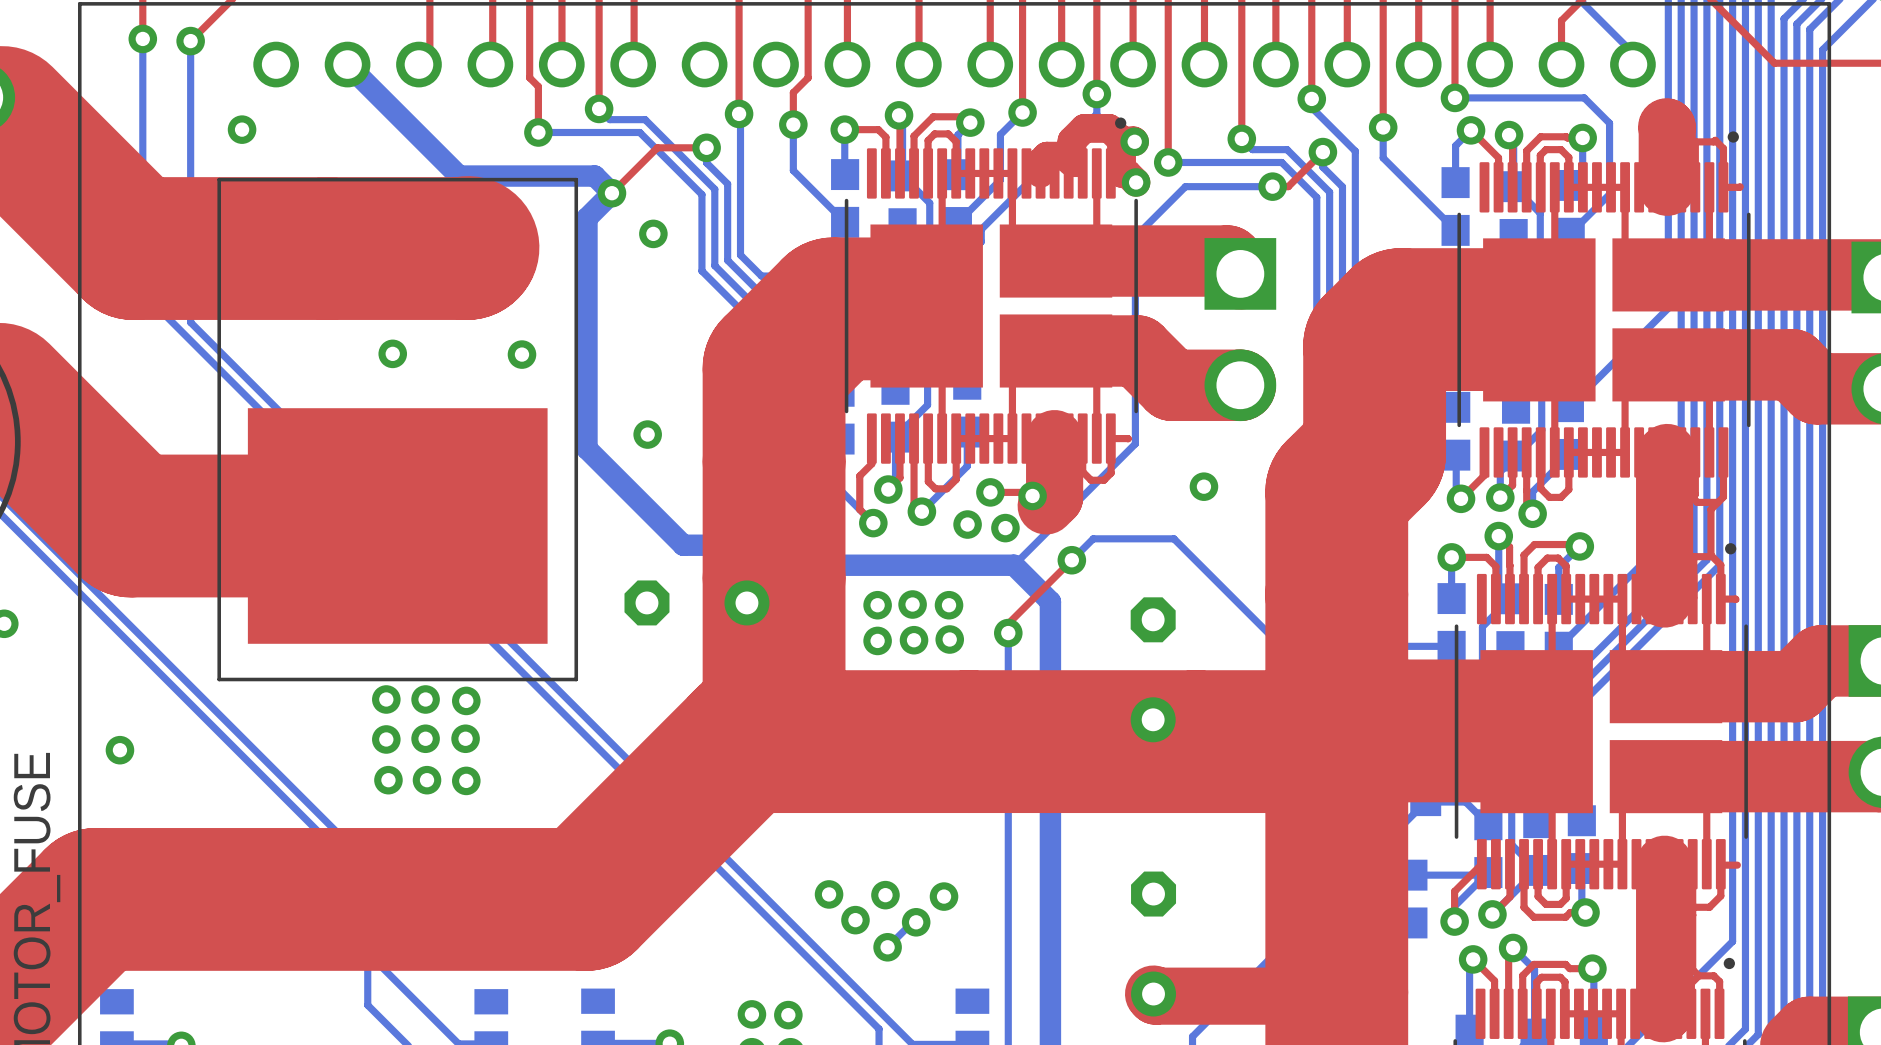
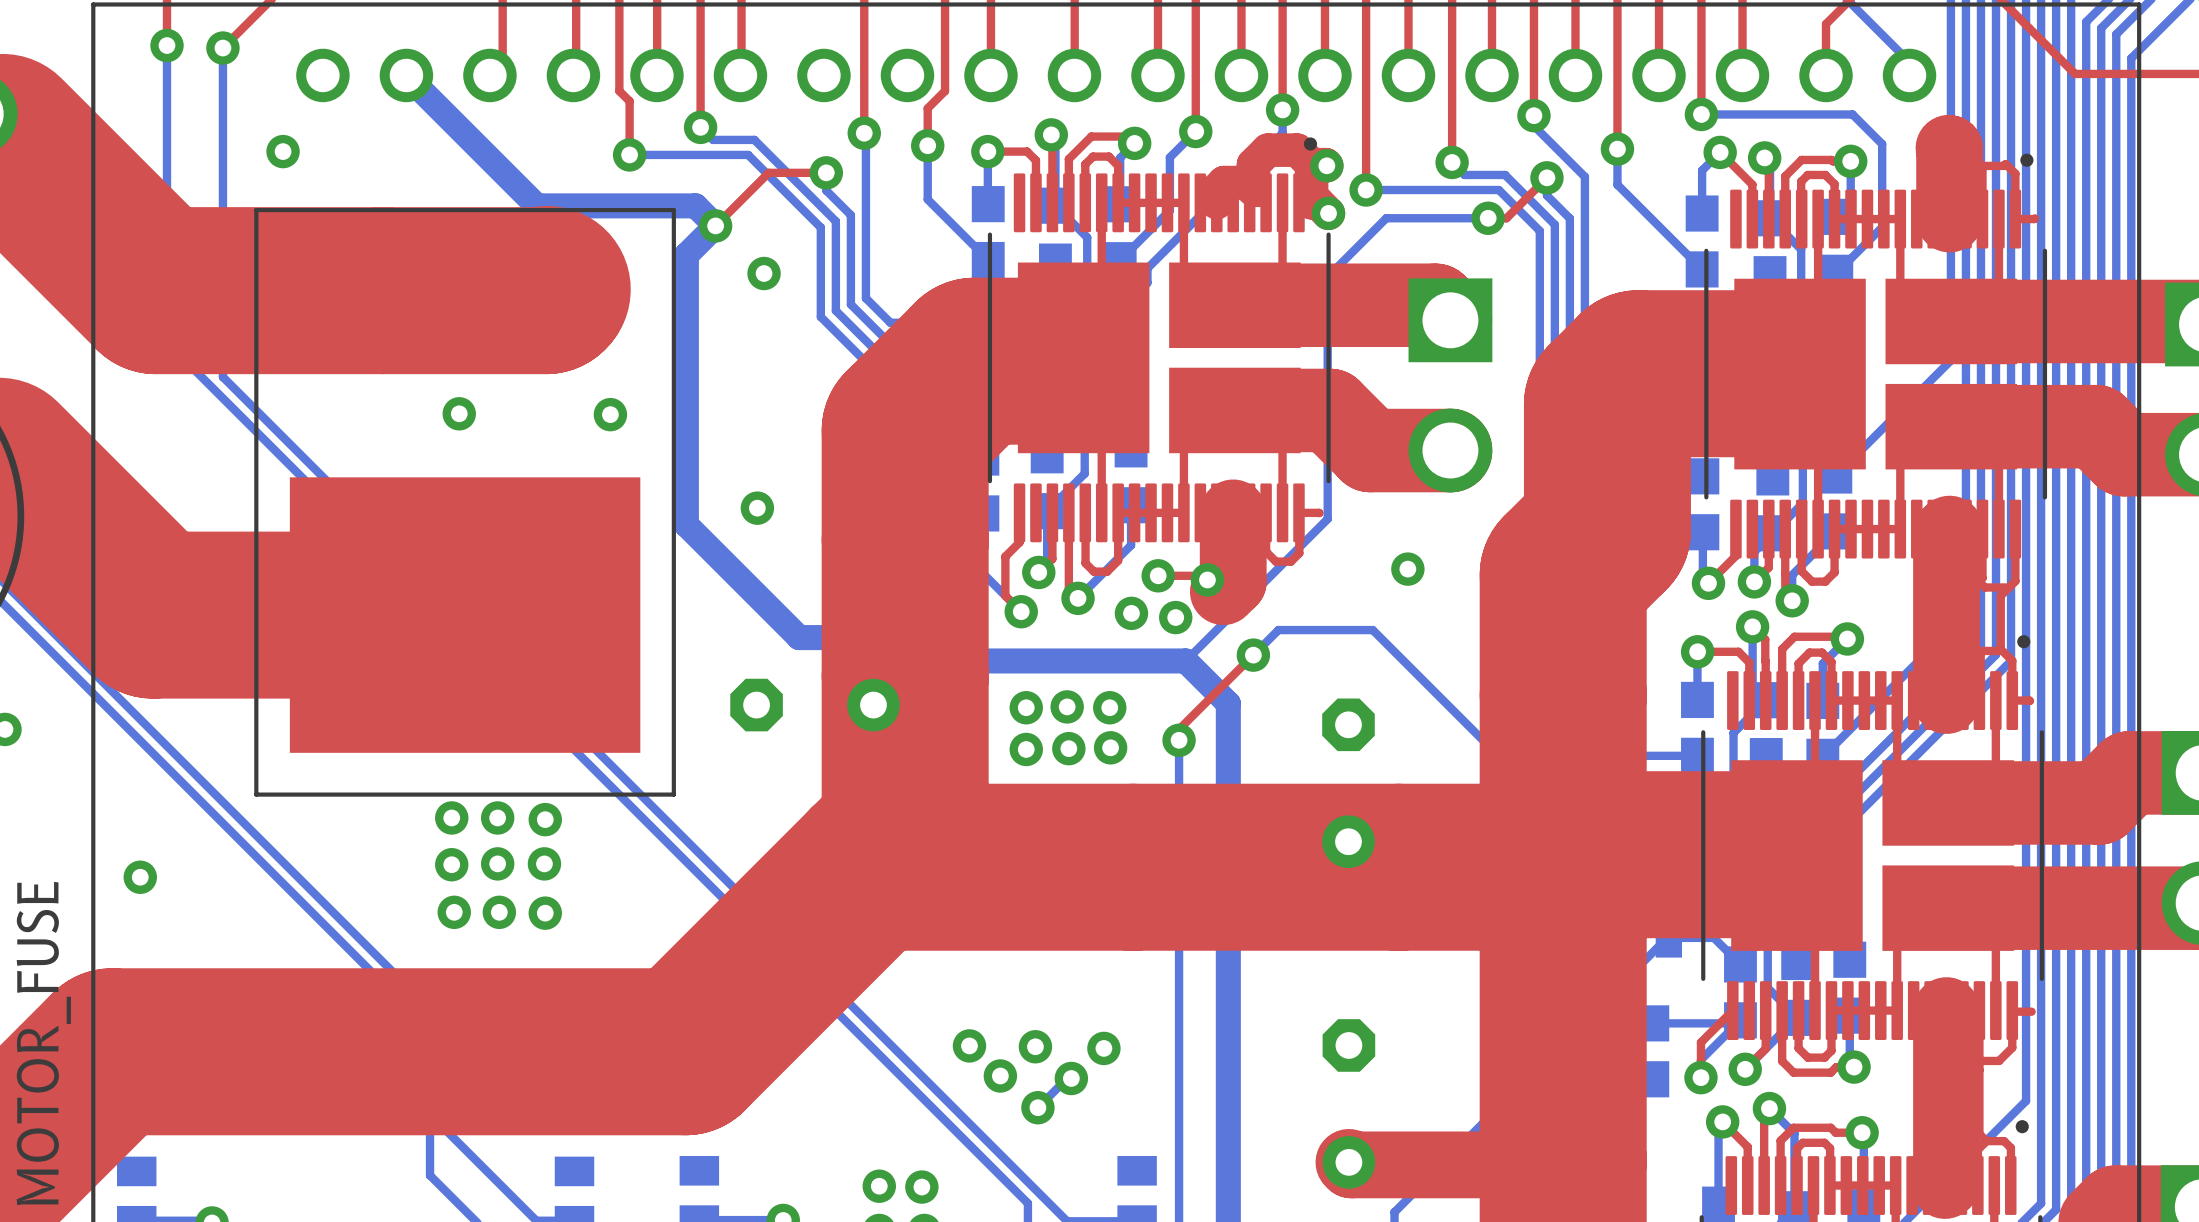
part footprint: [1362, 787, 1442, 817] -> [1596, 918, 1683, 958]

